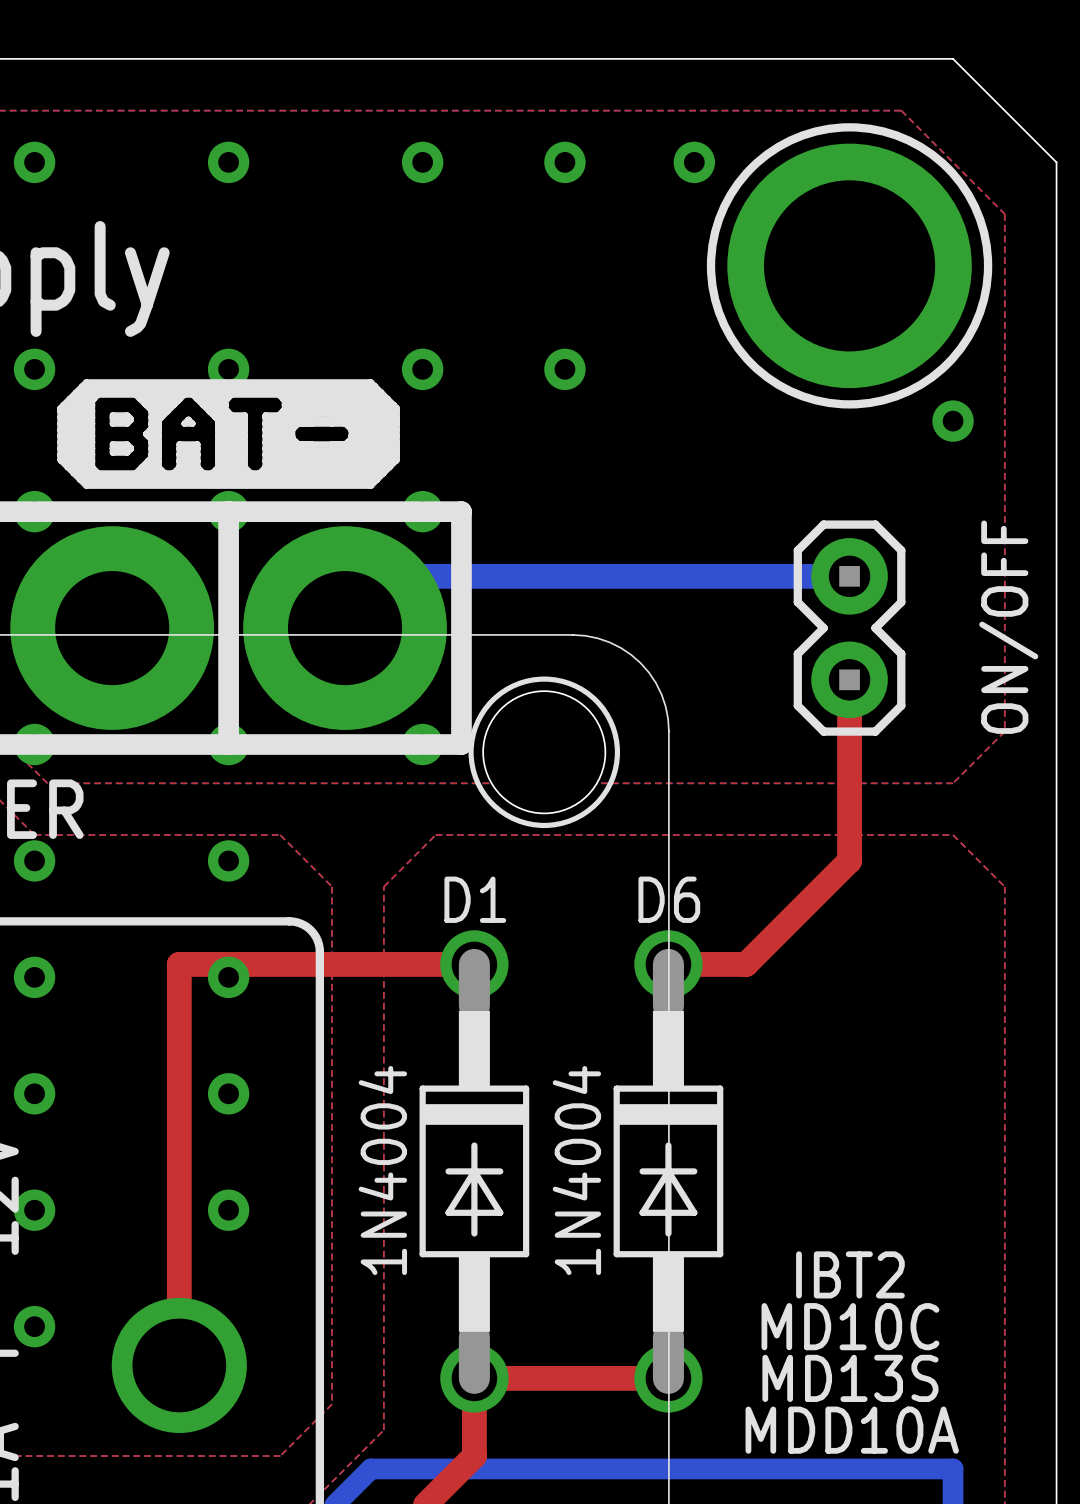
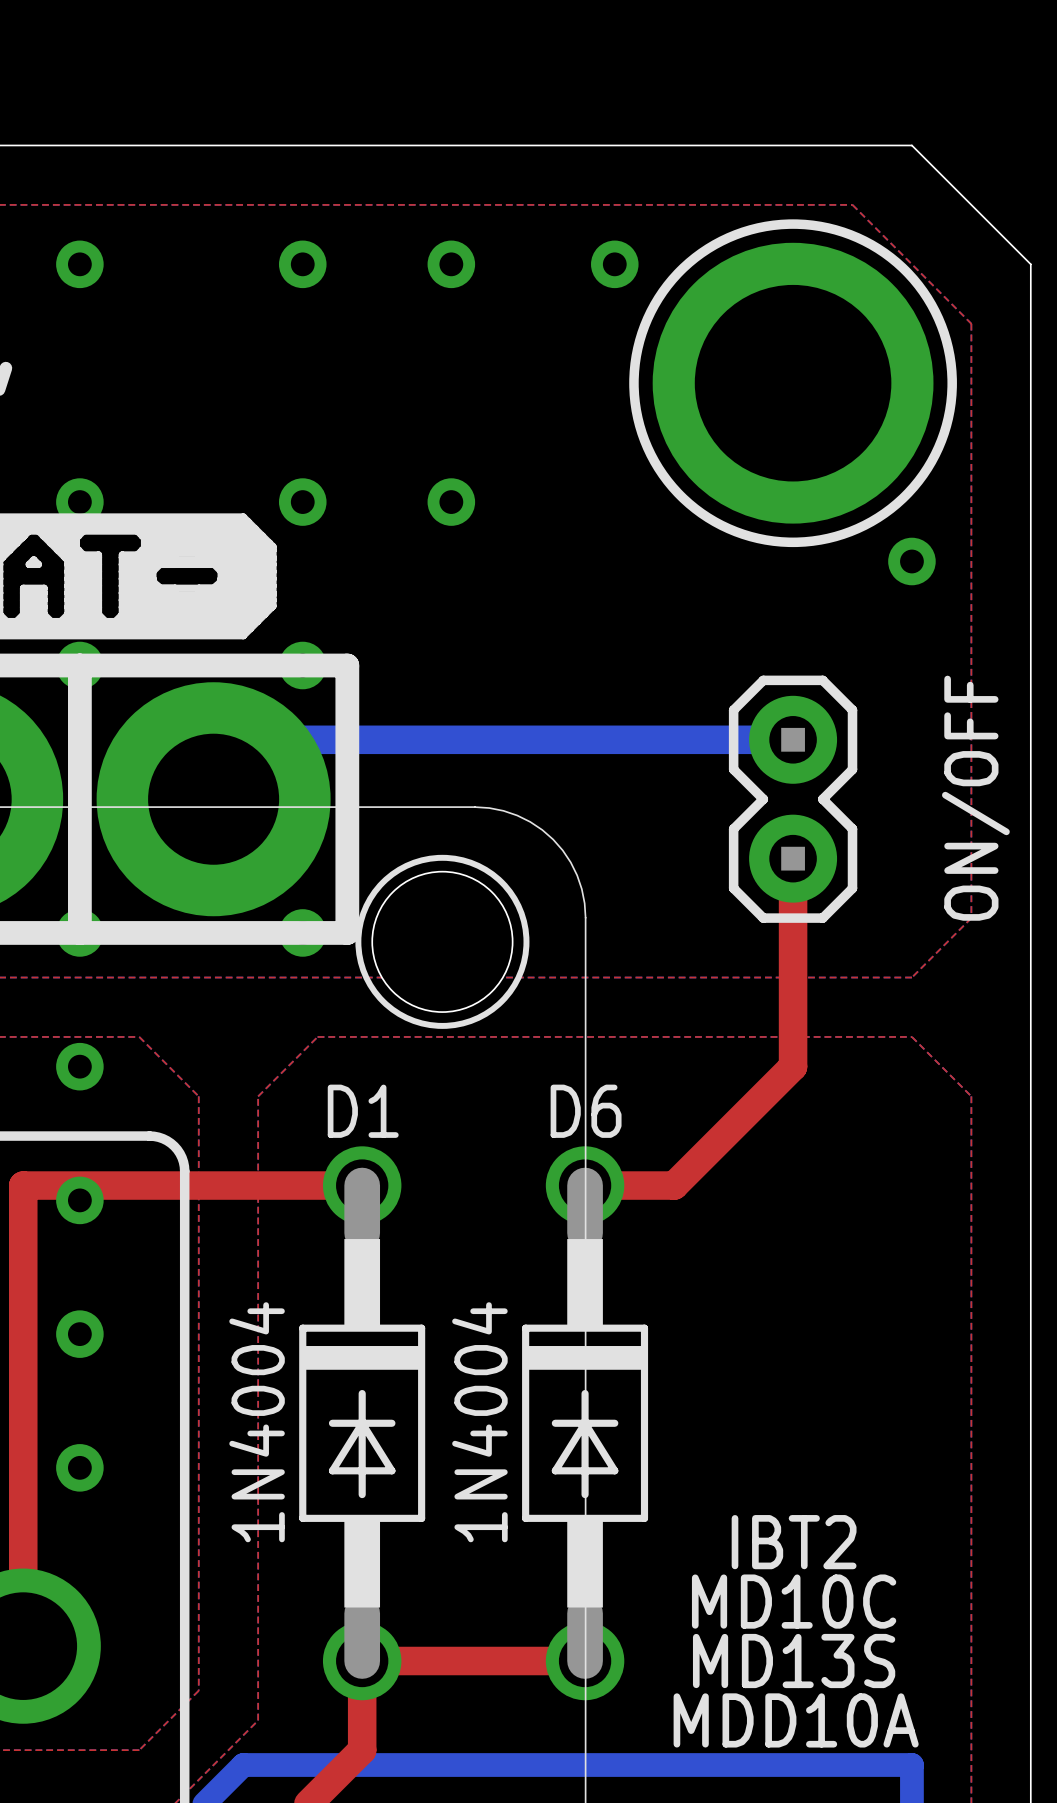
via position: (564, 162) -> (451, 264)
via position: (564, 369) -> (451, 502)

